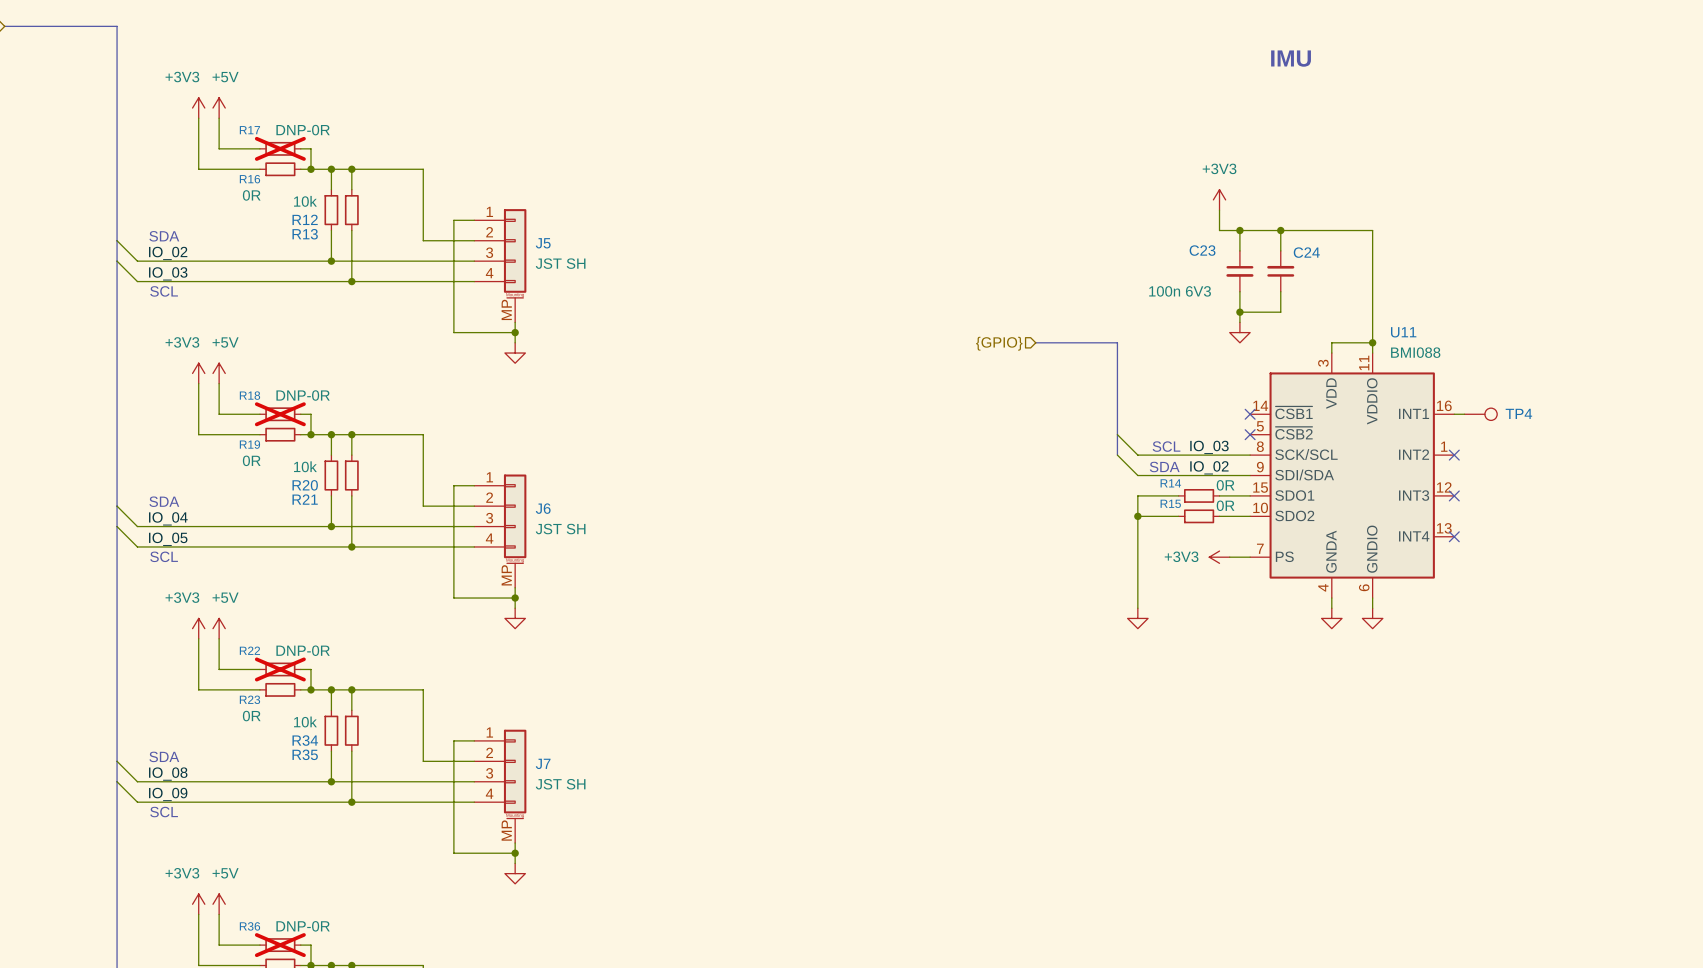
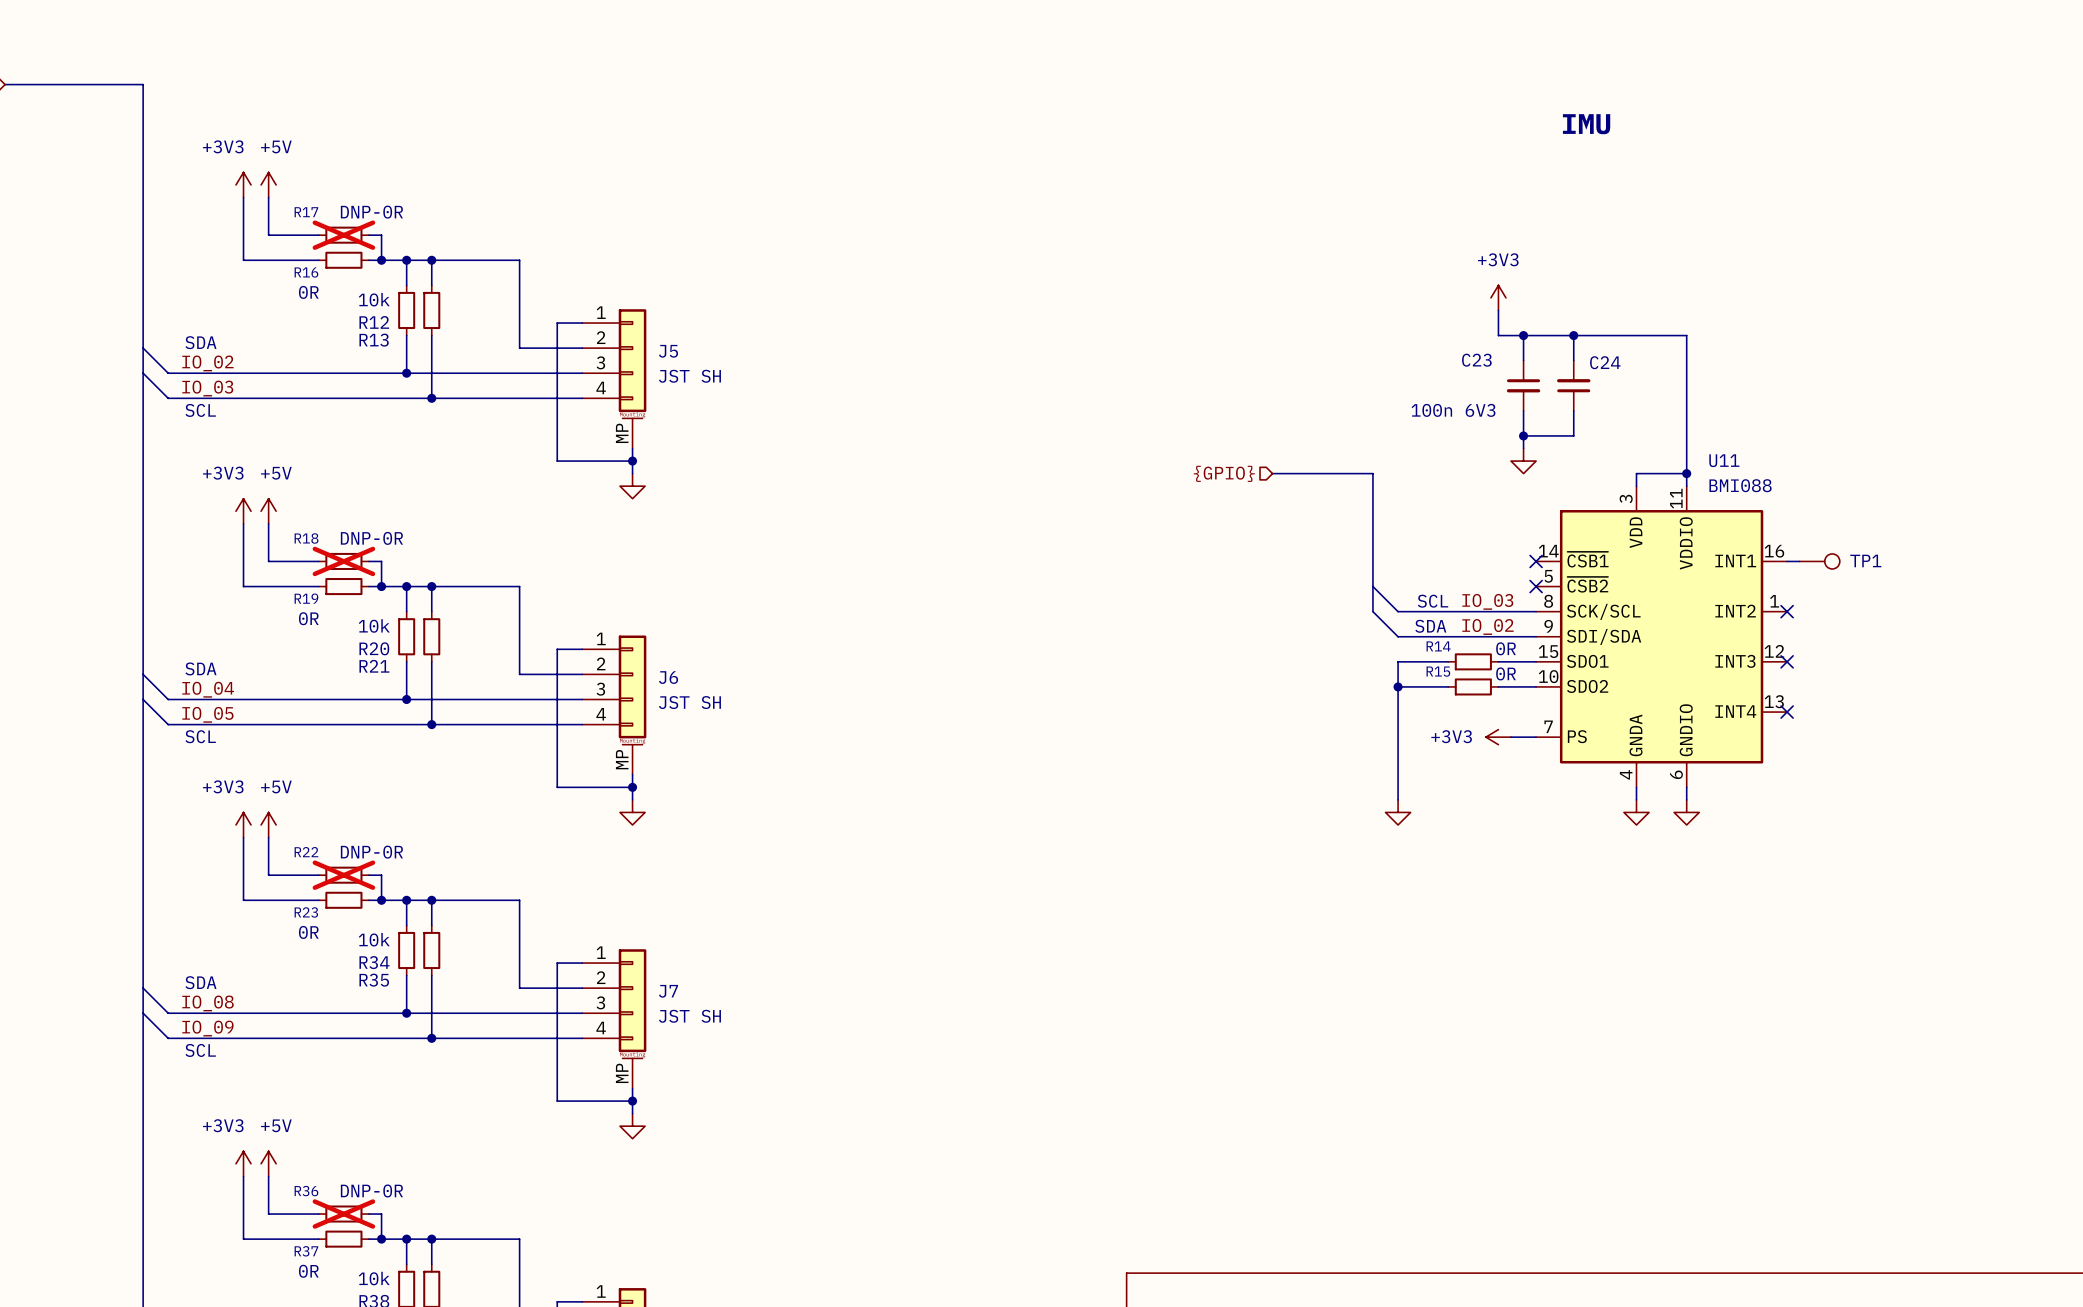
TP4 name: TP4 (1518, 413) -> TP1 (1865, 560)

